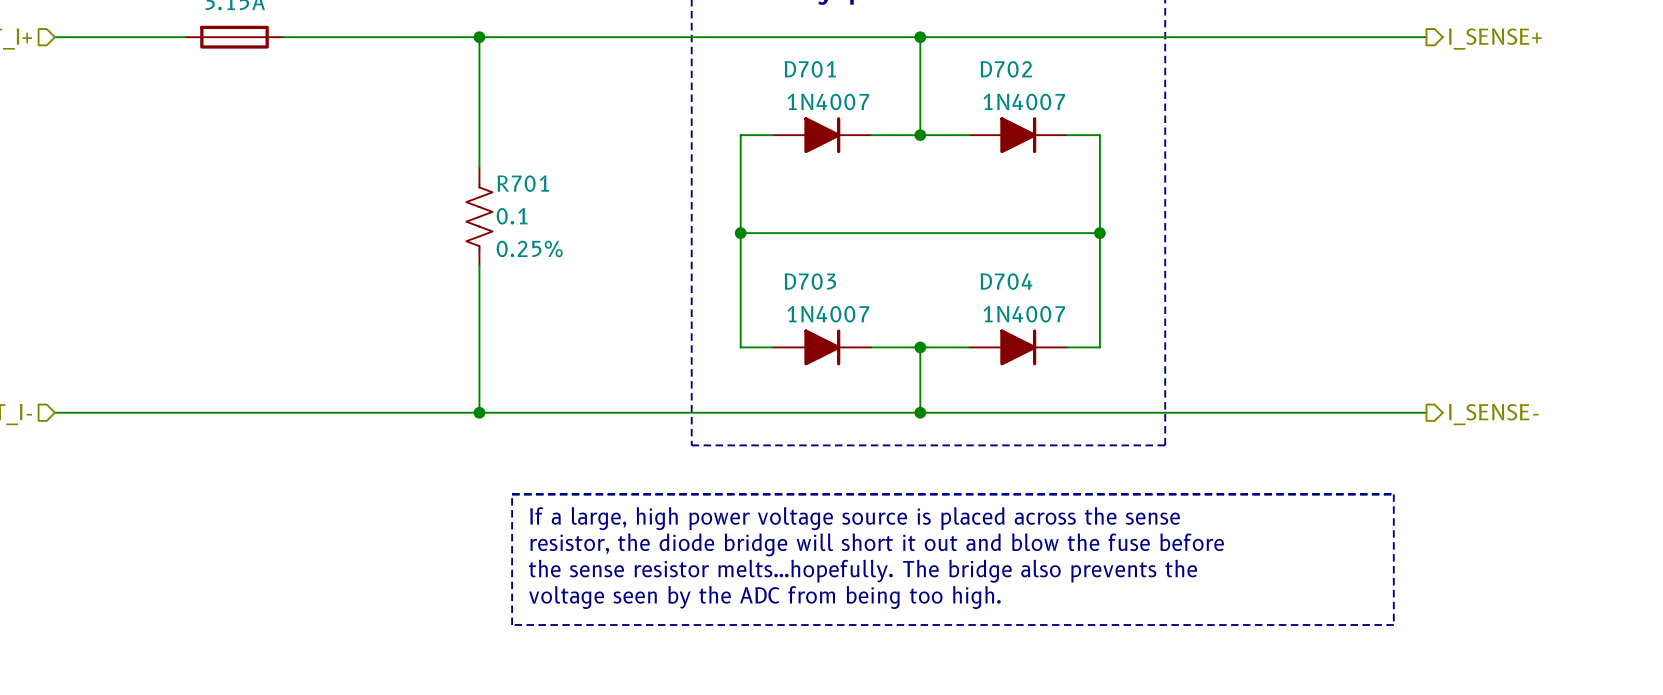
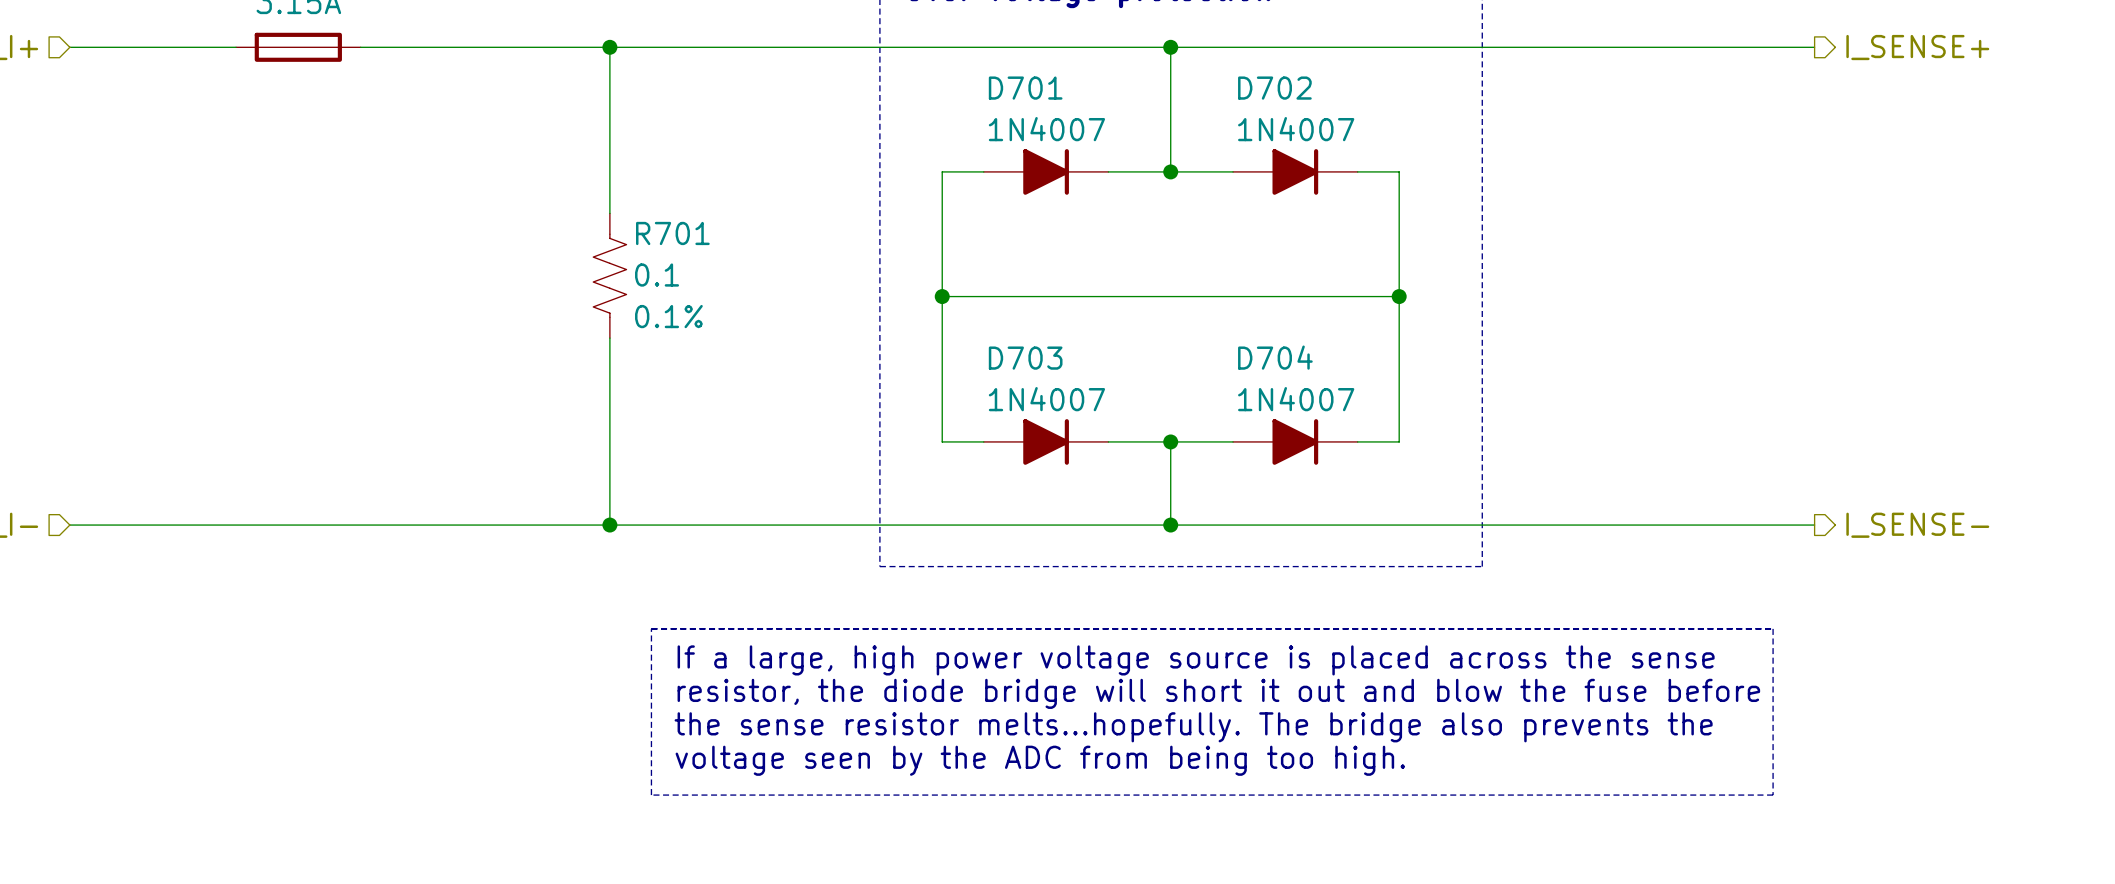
R701 text: 0.25% (529, 248) -> 0.1% (668, 316)

